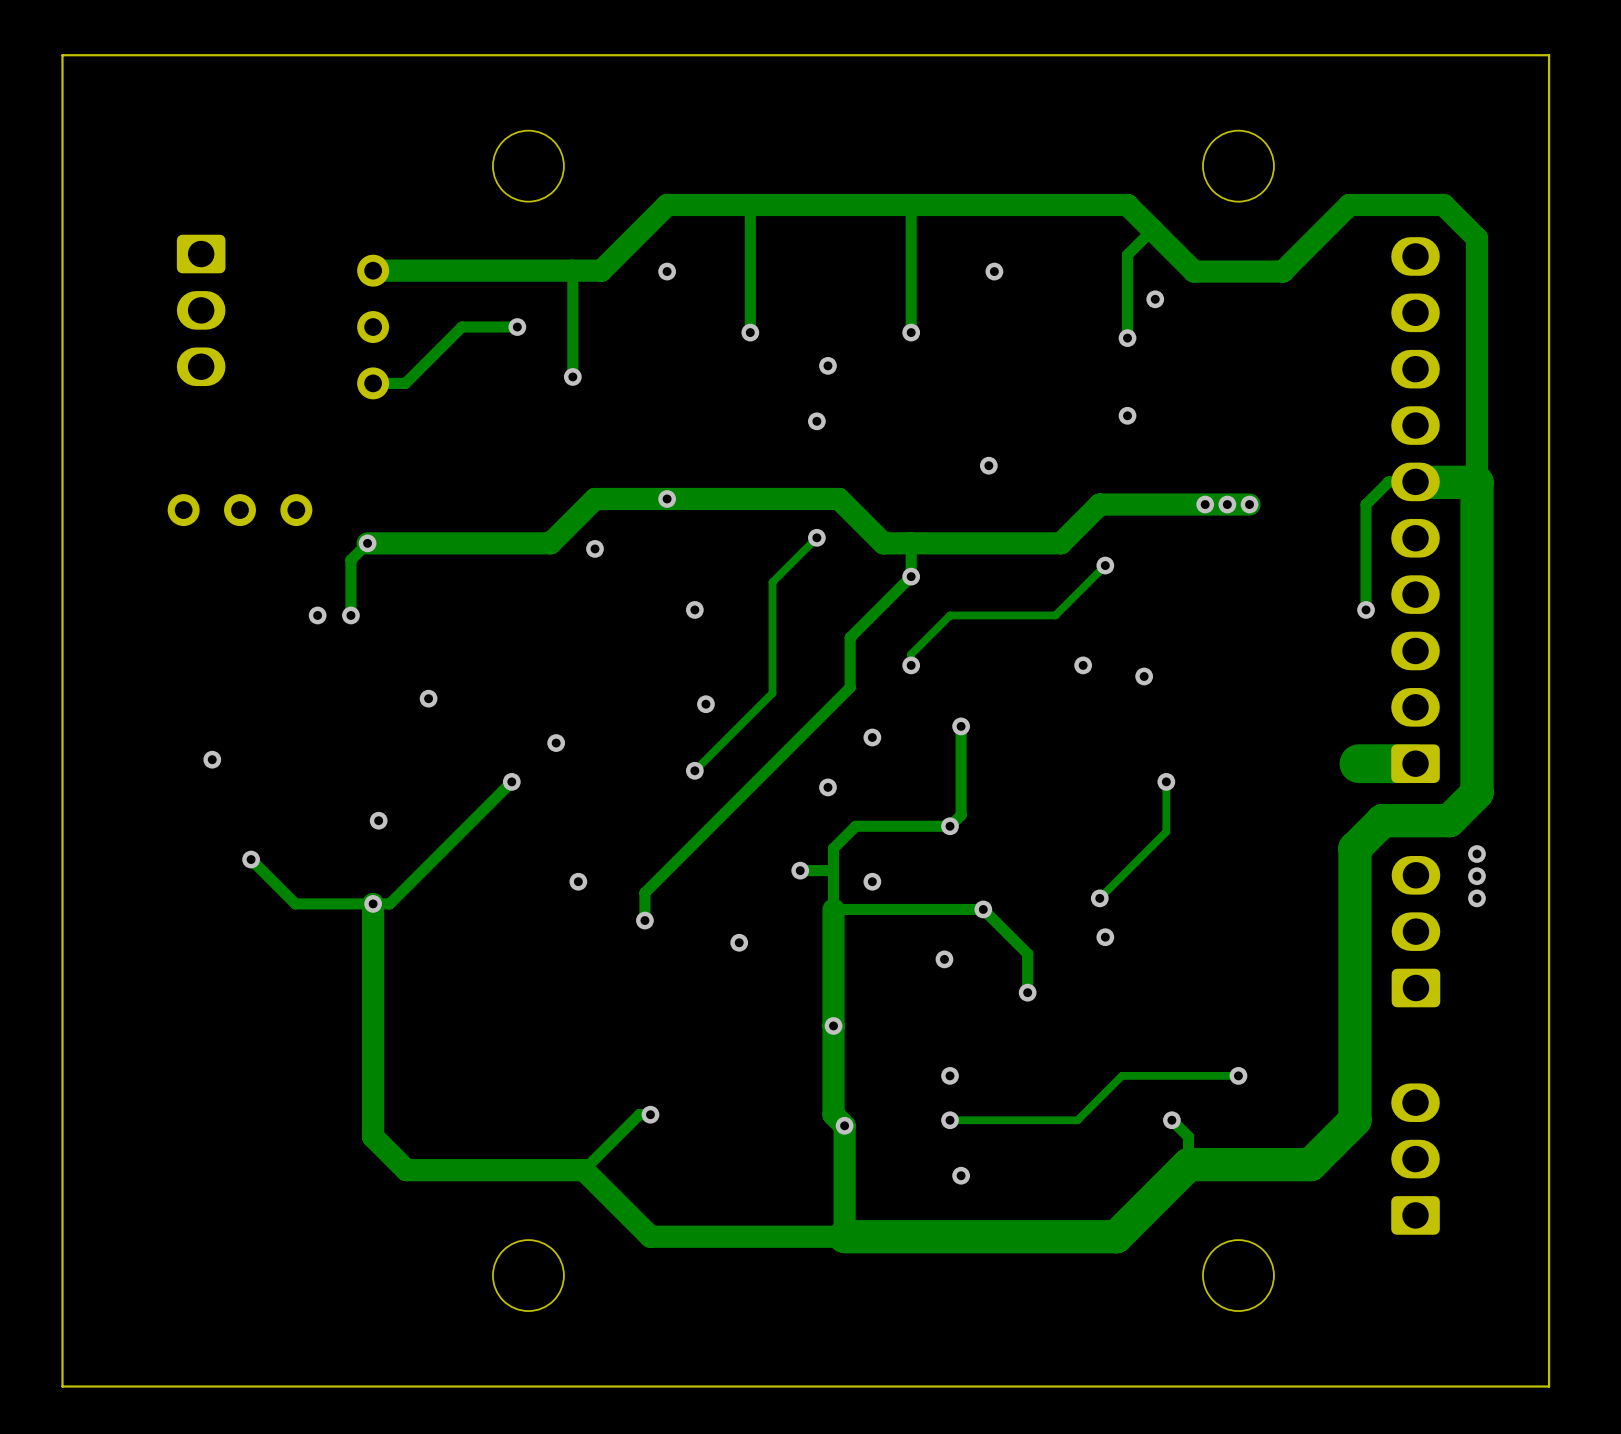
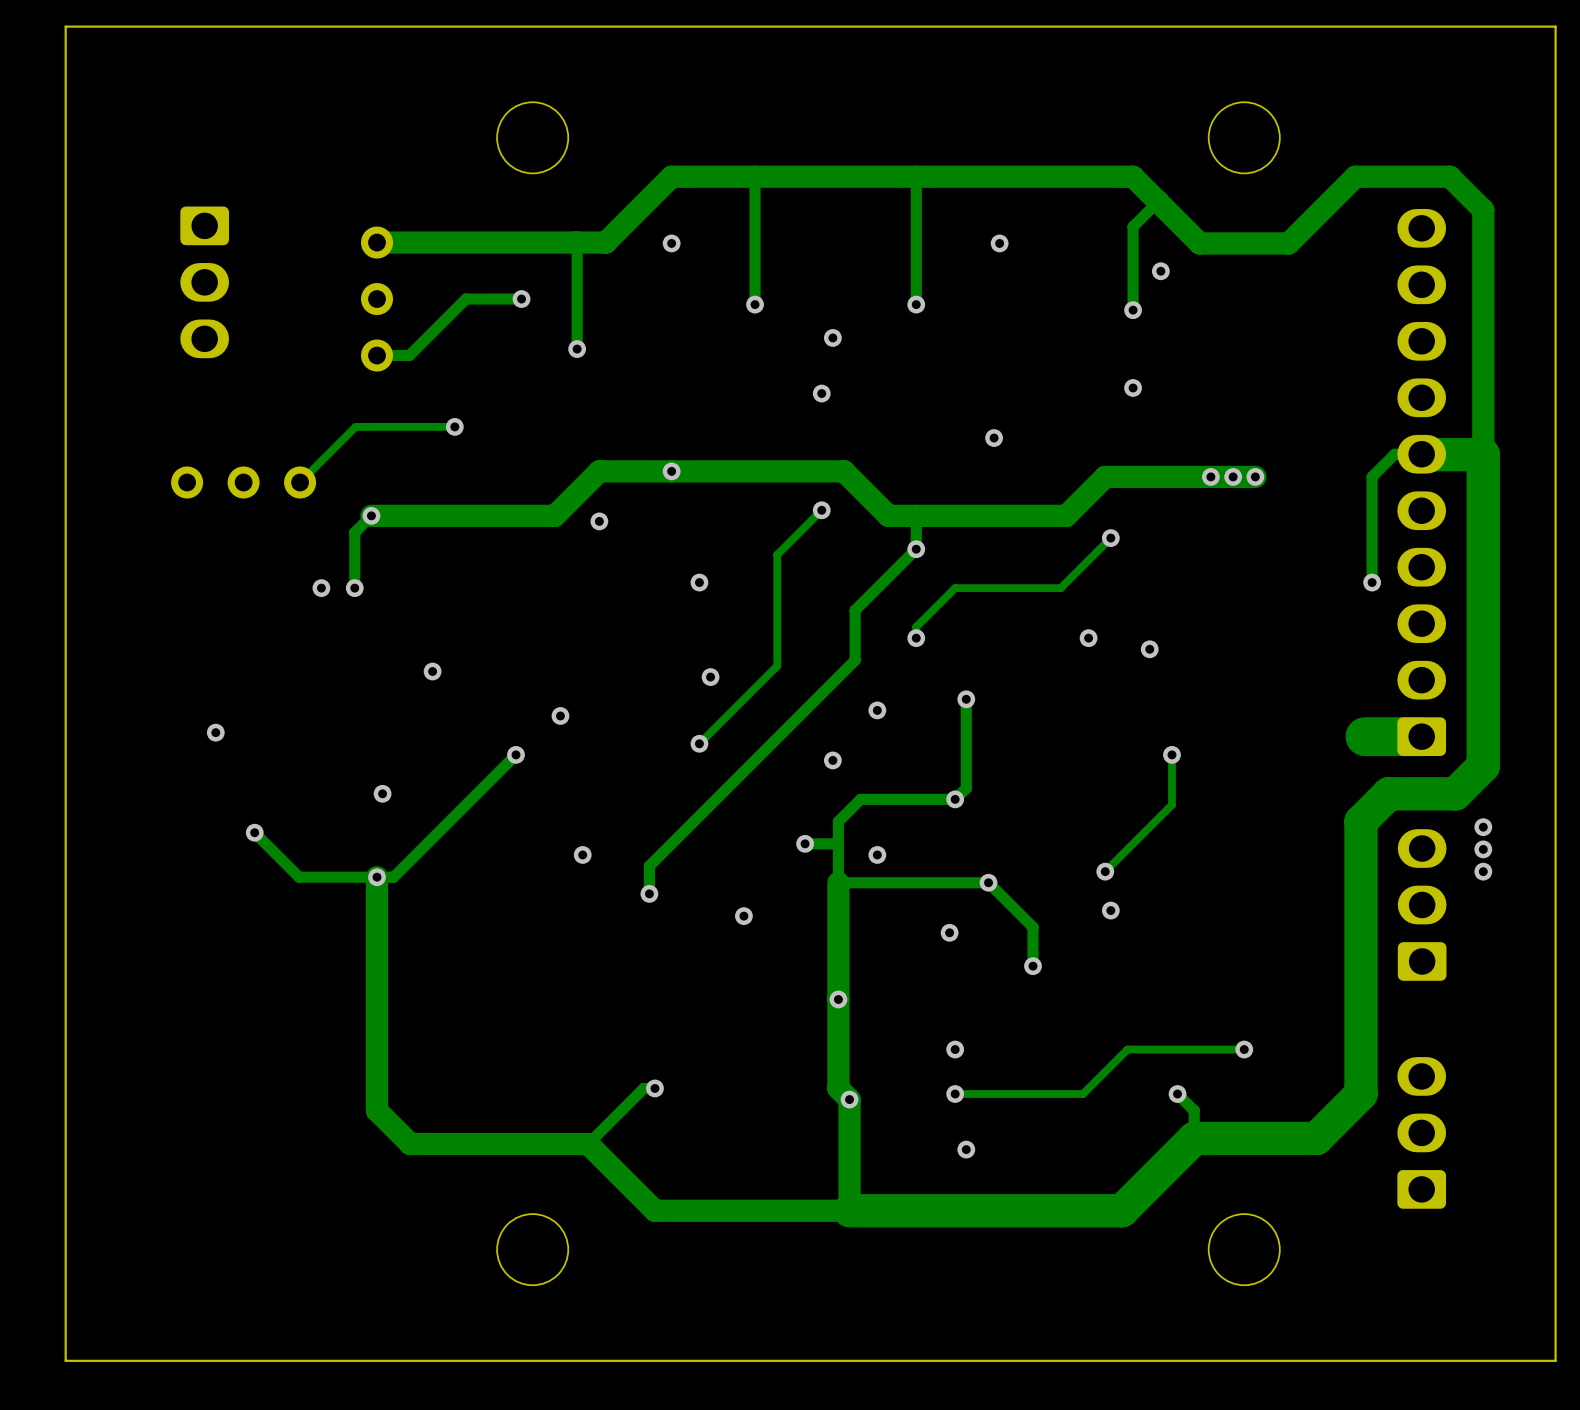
track: none -> (454, 426) (355, 426) (300, 482)
via: none -> (454, 426)

